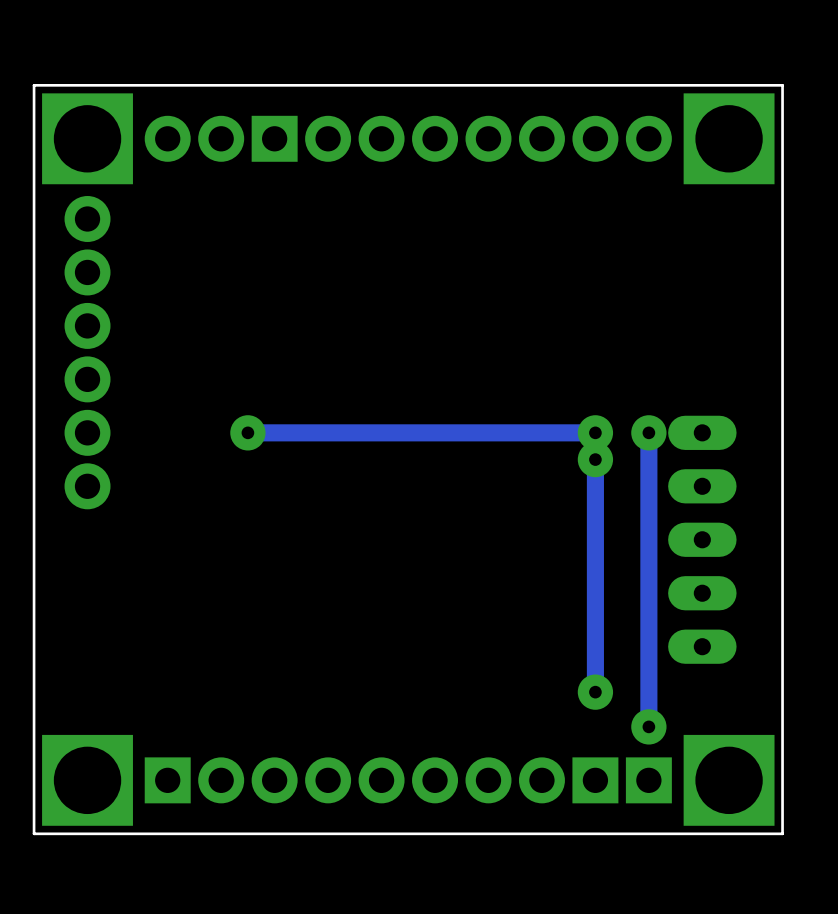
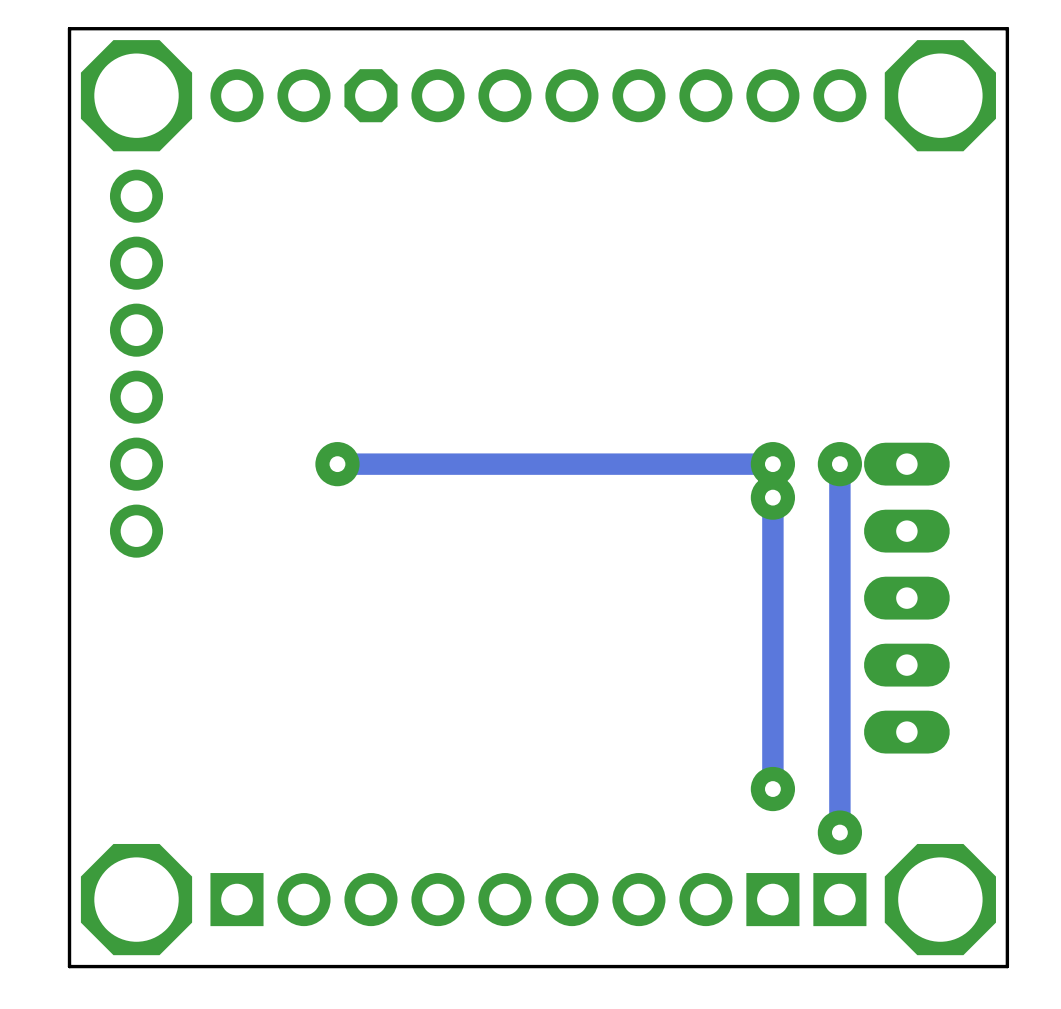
part footprint: [32, 84, 784, 836] -> [67, 27, 1010, 969]

